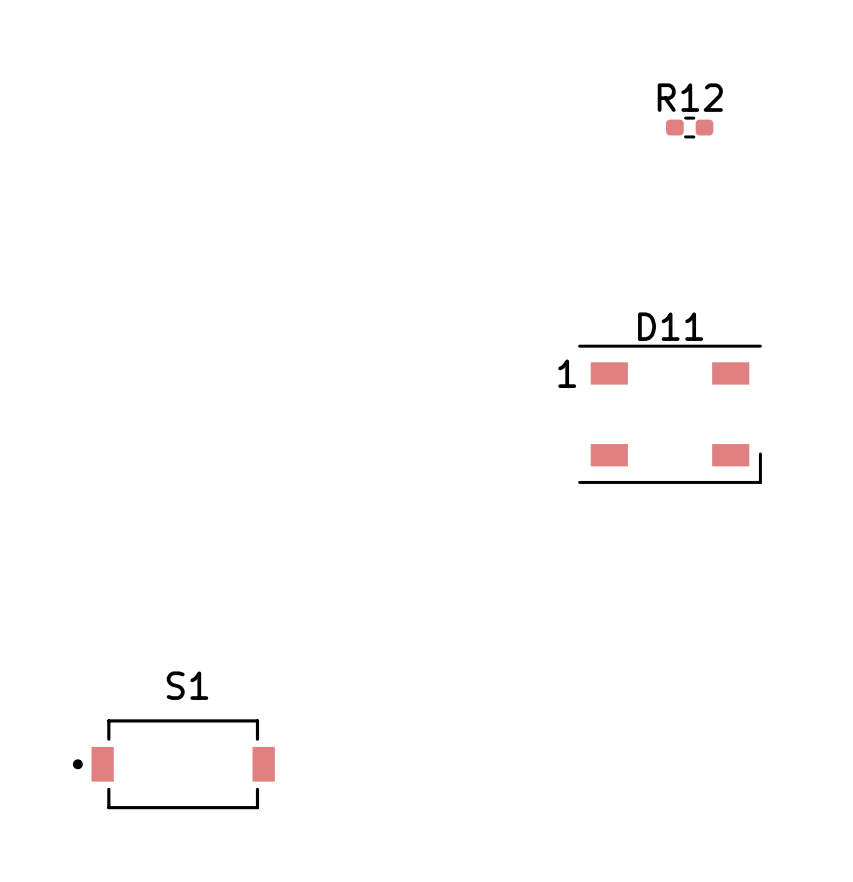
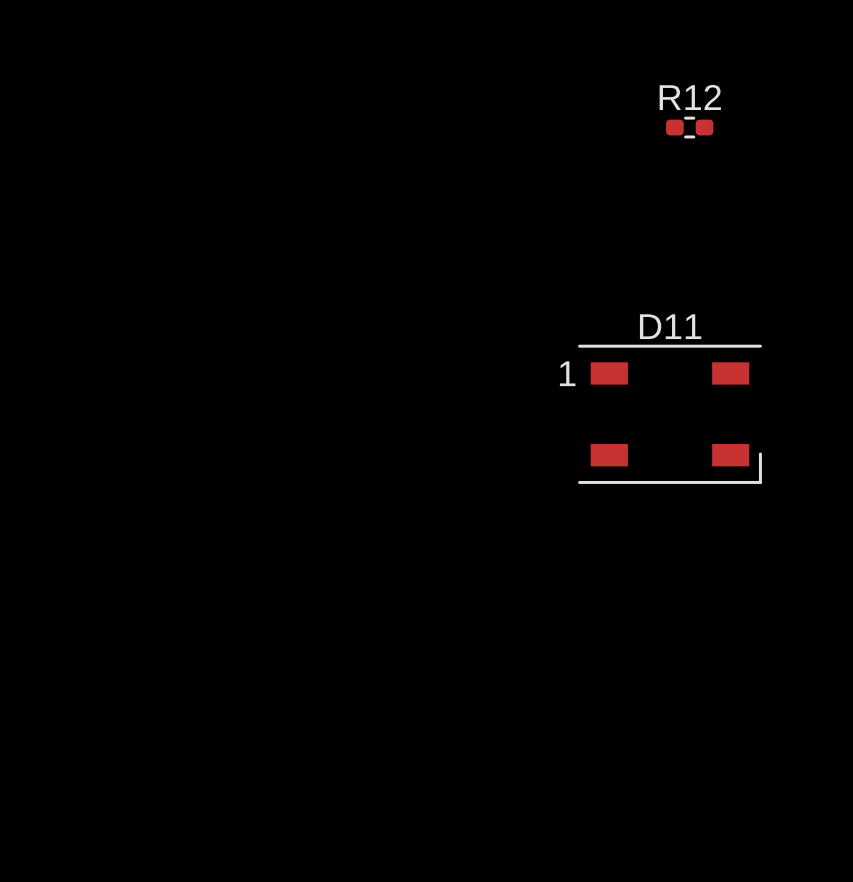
S1: (173, 764) -> none

